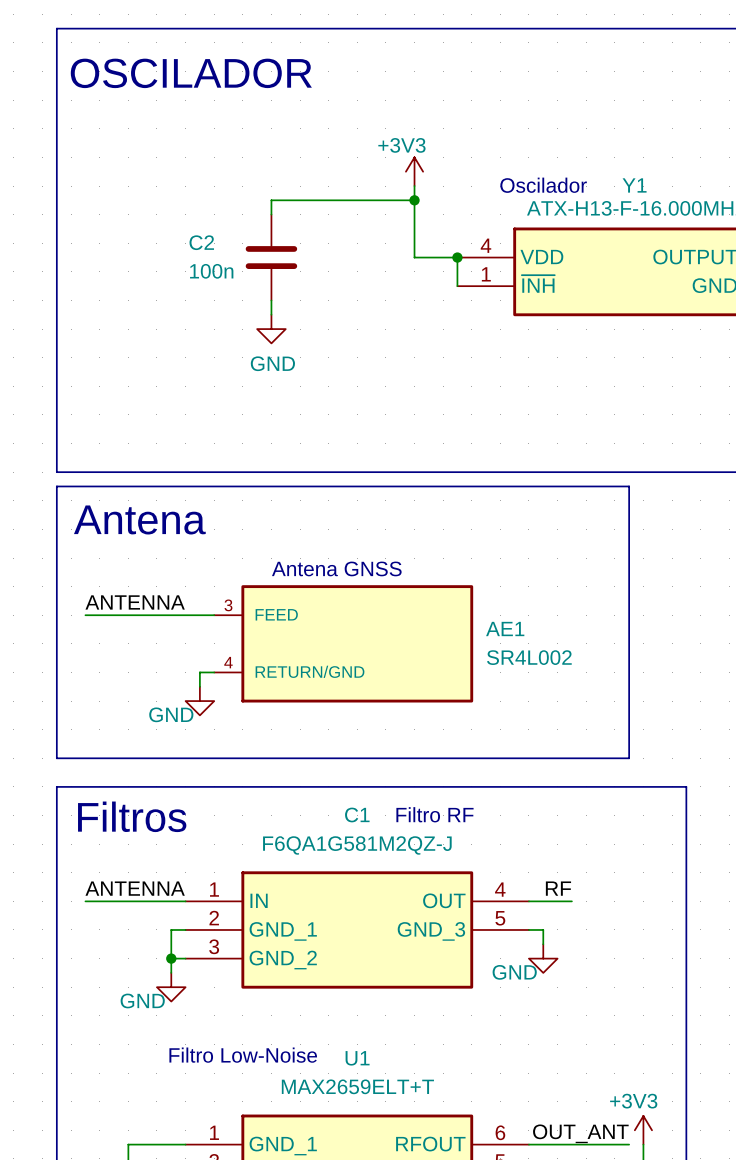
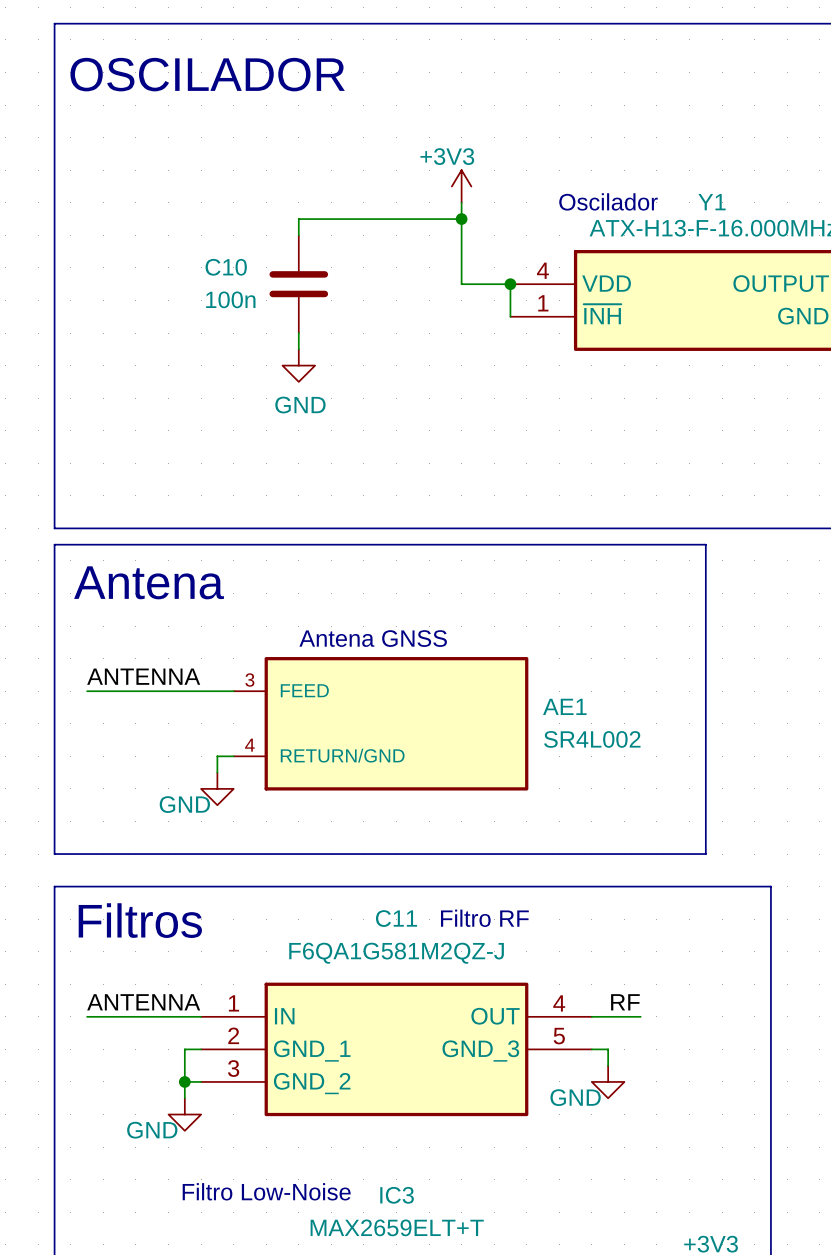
C2 name: C2 (201, 242) -> C10 (226, 267)
C1 name: C1 (357, 814) -> C11 (396, 918)
U1 name: U1 (357, 1058) -> IC3 (397, 1195)

